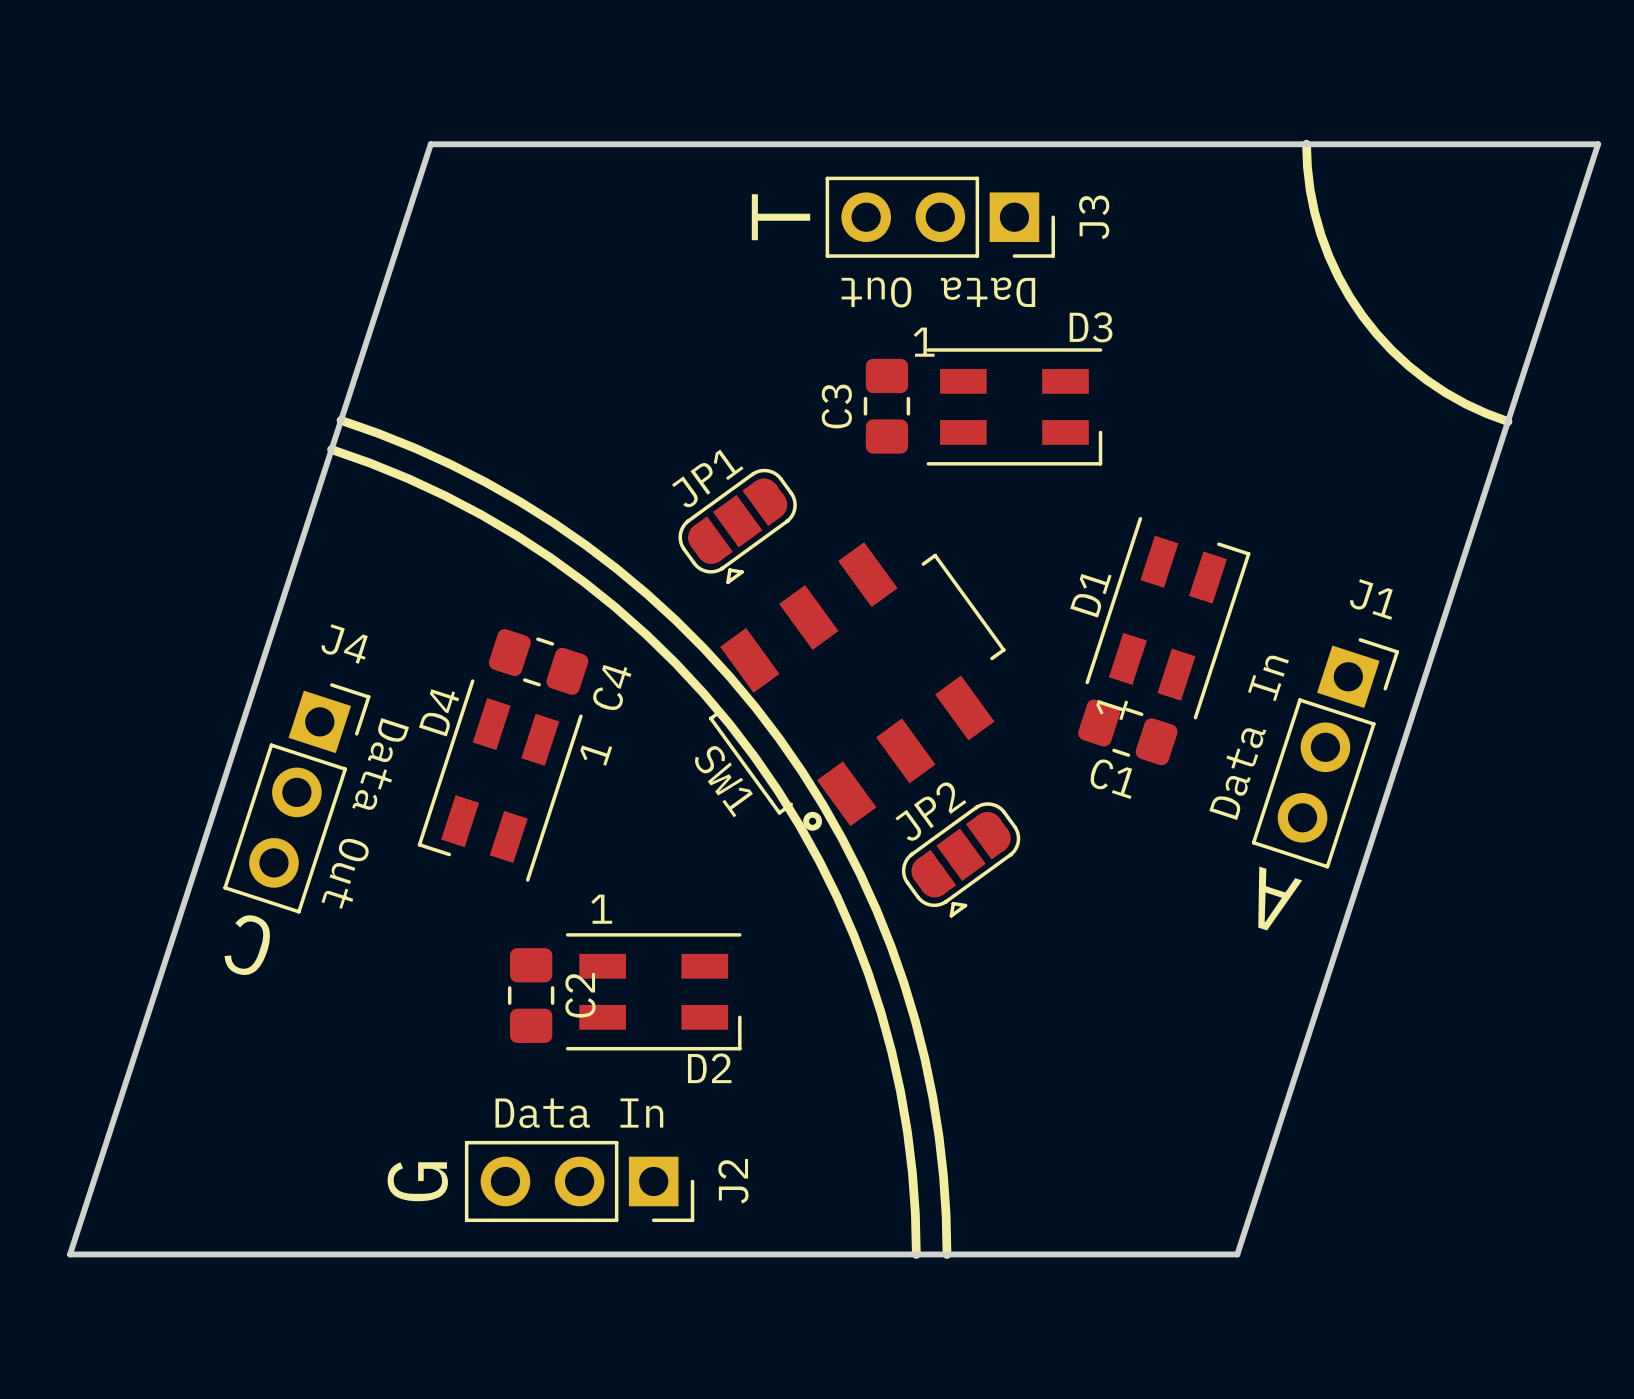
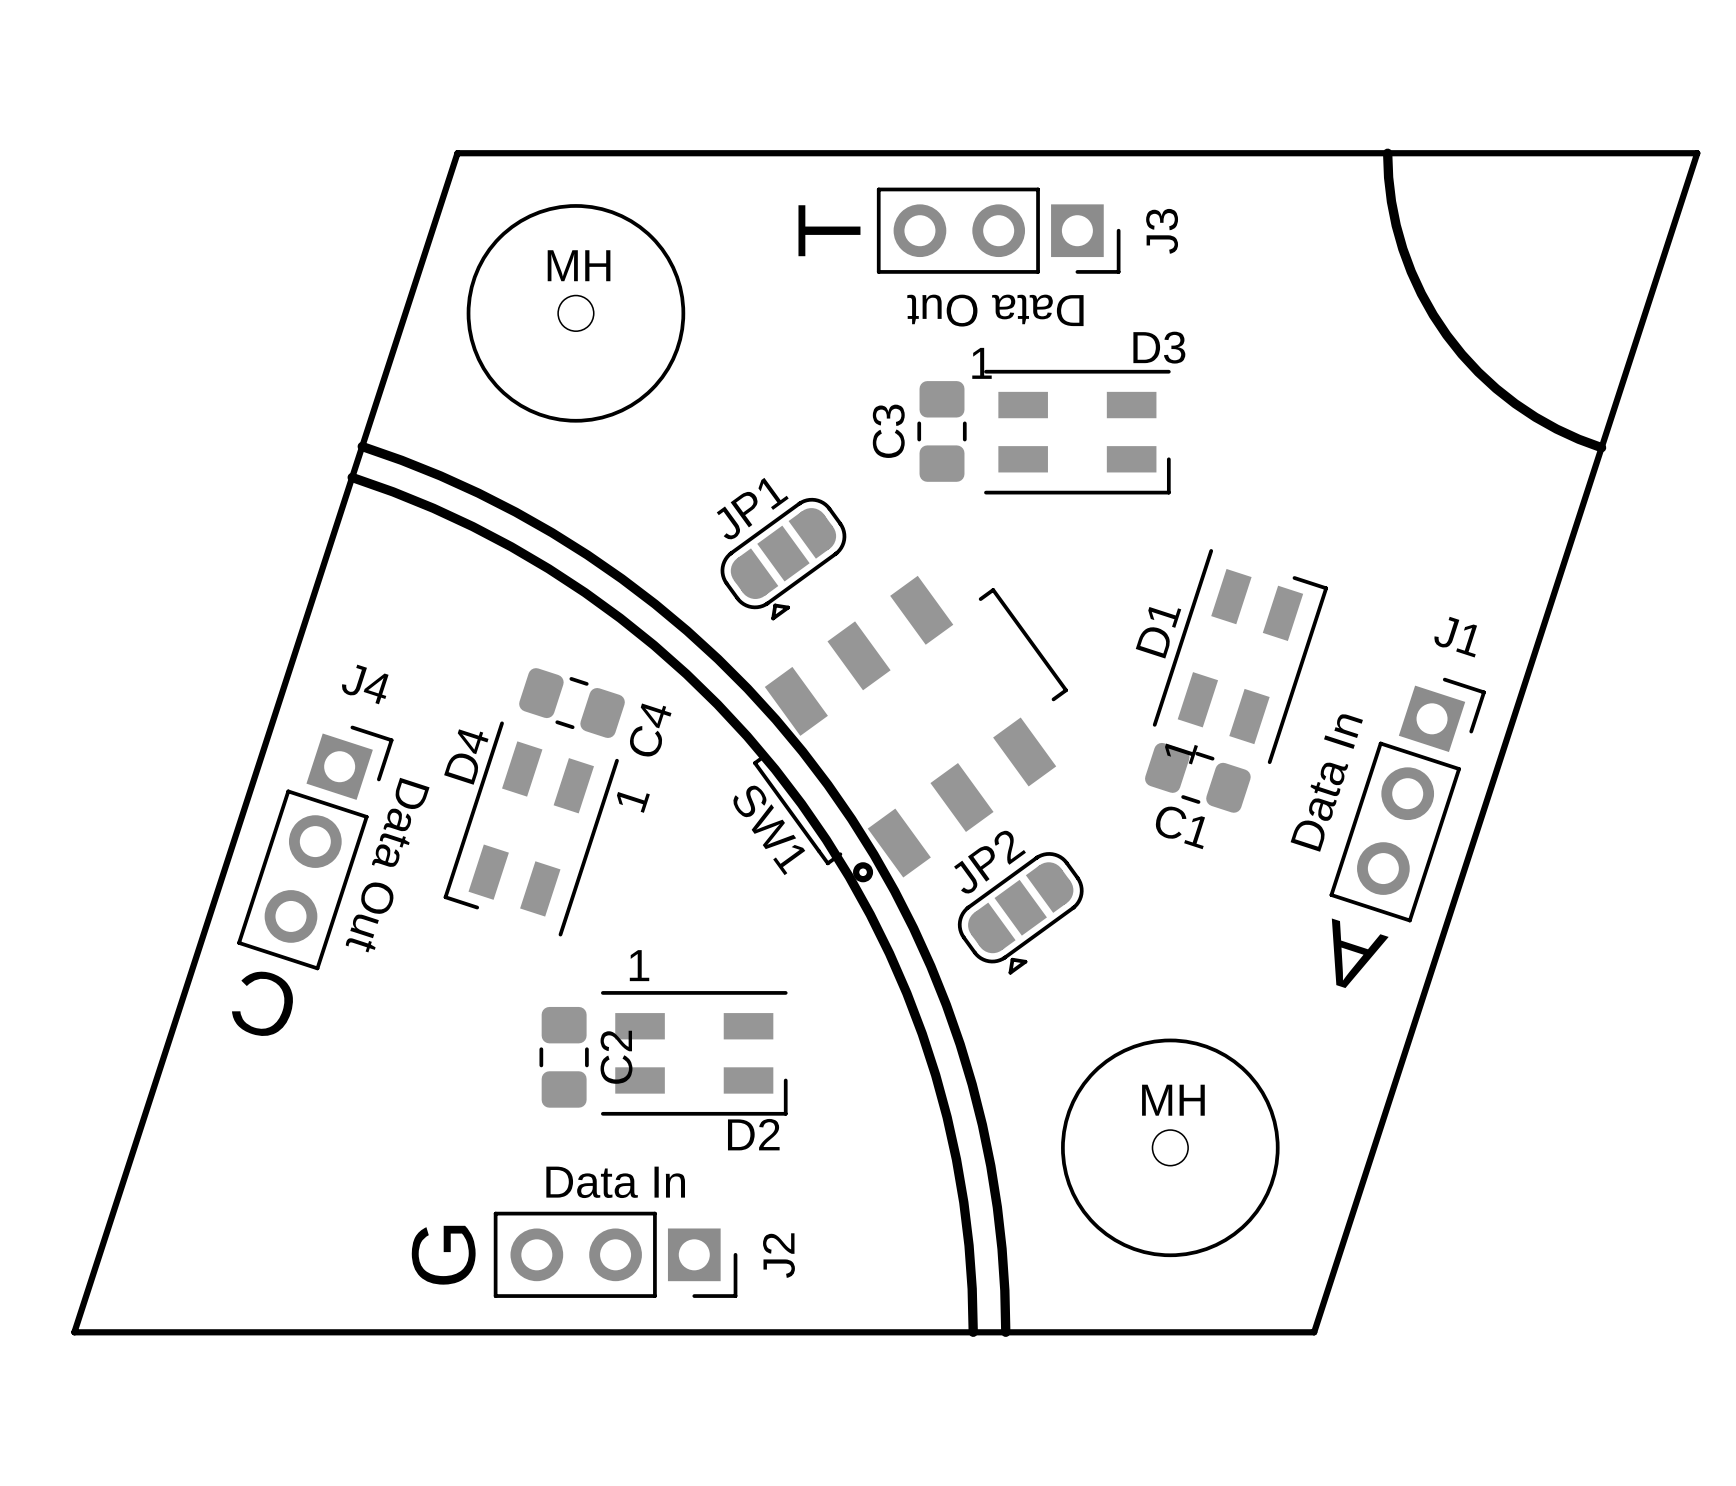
MH: none -> (575, 313)
MH: none -> (1170, 1147)

